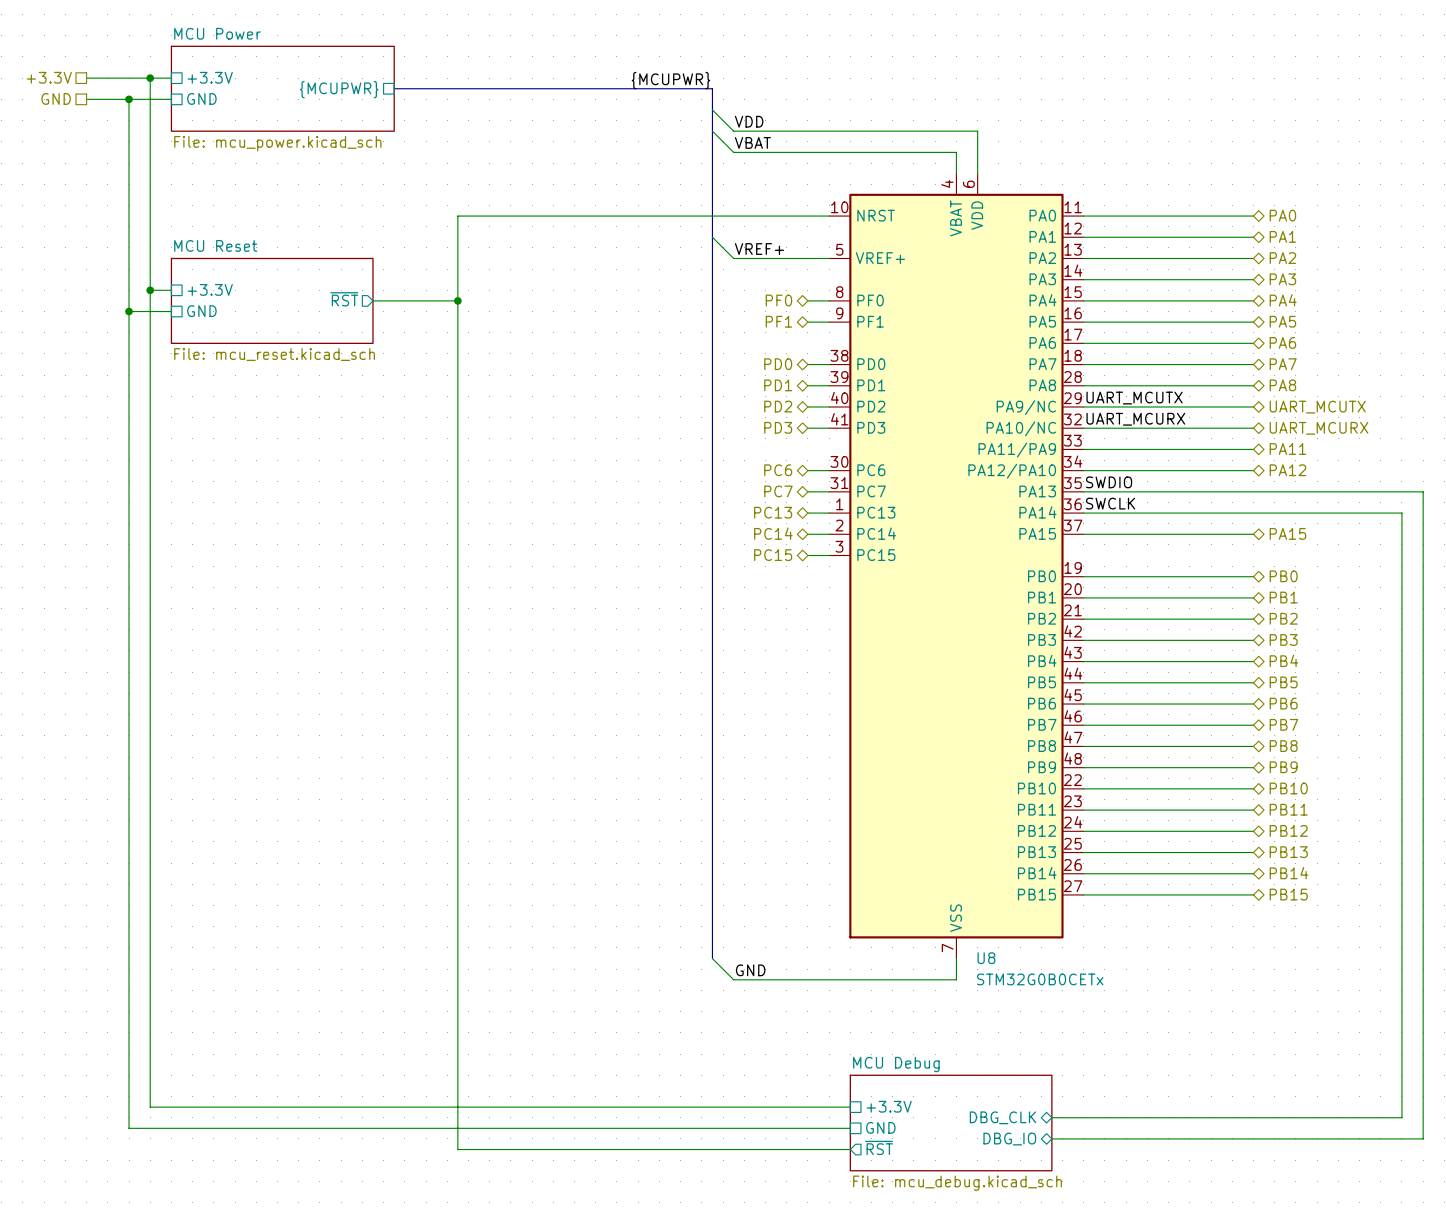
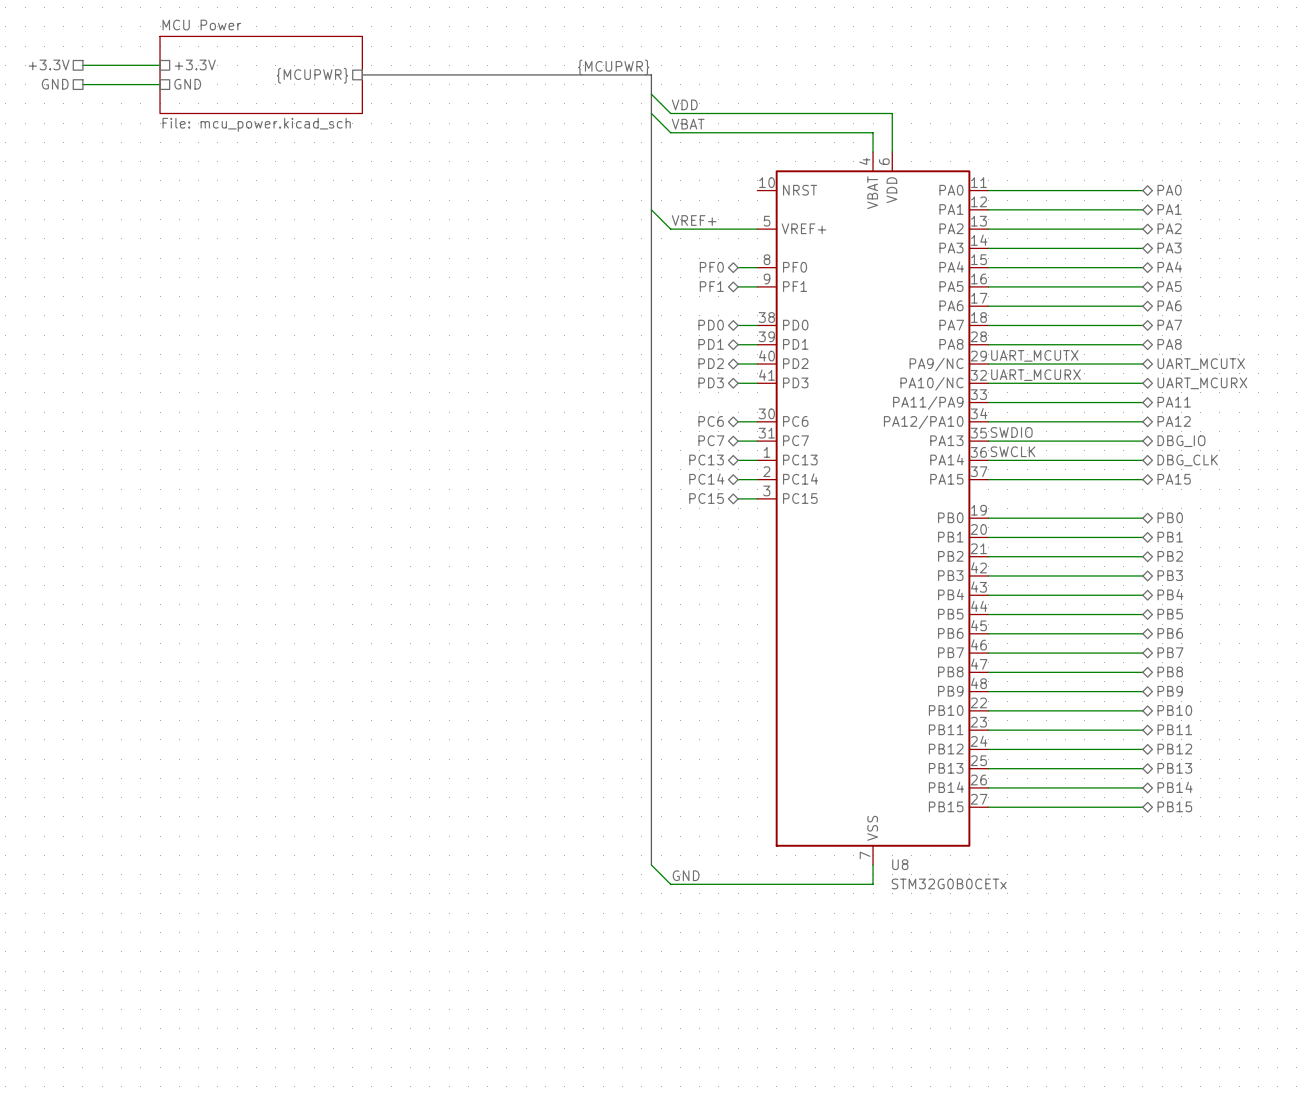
wire: (150, 78) (150, 1107) (850, 1107) -> none
junction: (150, 78) -> none
wire: (129, 99) (129, 1128) (850, 1128) -> none
junction: (129, 99) -> none
wire: (829, 216) (457, 216) (457, 1149) (850, 1149) -> none
sheet pin: +3.3V (210, 289) -> none
wire: (150, 290) (171, 290) -> none
junction: (150, 290) -> none
sheet pin: ~{RST} (344, 299) -> none
sheet MCU Reset: File: mcu_reset.kicad_sch (272, 300) -> none
wire: (372, 300) (457, 300) -> none
junction: (457, 300) -> none
wire: (129, 311) (171, 311) -> none
junction: (129, 311) -> none
sheet pin: GND (201, 311) -> none
wire: (1253, 491) (1423, 491) (1423, 1138) (1051, 1138) -> none
hierarchical label: none -> DBG_IO (1181, 441)
wire: (1253, 513) (1401, 513) (1401, 1117) (1051, 1117) -> none
hierarchical label: none -> DBG_CLK (1187, 460)
sheet pin: +3.3V (889, 1106) -> none
sheet pin: DBG_CLK (1002, 1117) -> none
sheet MCU Debug: File: mcu_debug.kicad_sch (951, 1123) -> none
sheet pin: GND (880, 1127) -> none
sheet pin: DBG_IO (1009, 1139) -> none
sheet pin: ~{RST} (879, 1147) -> none

